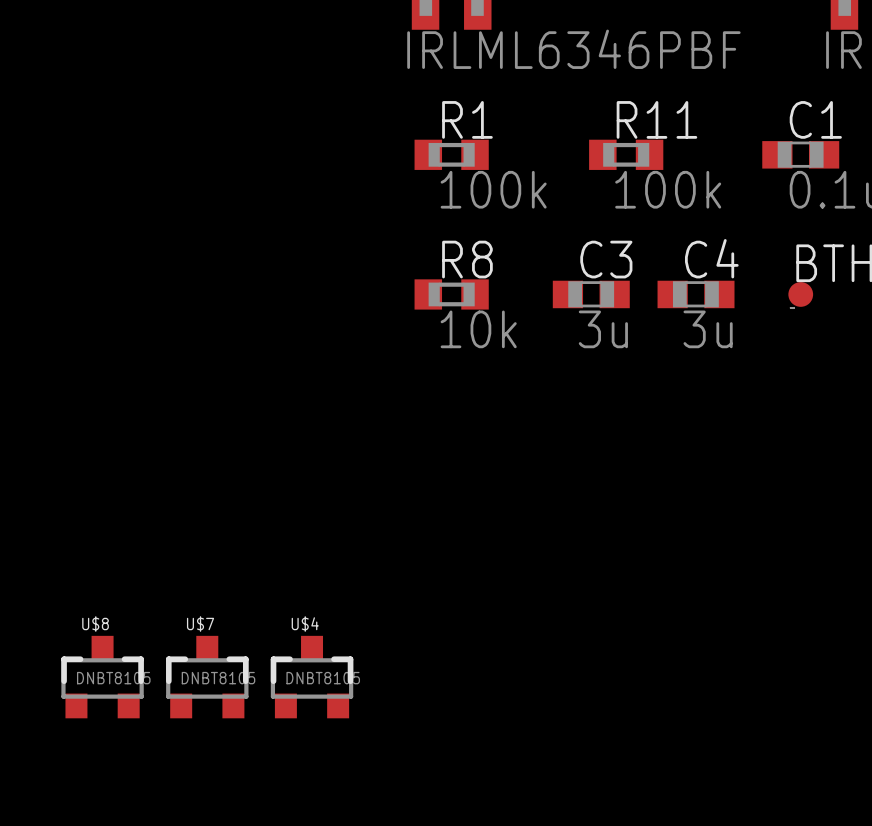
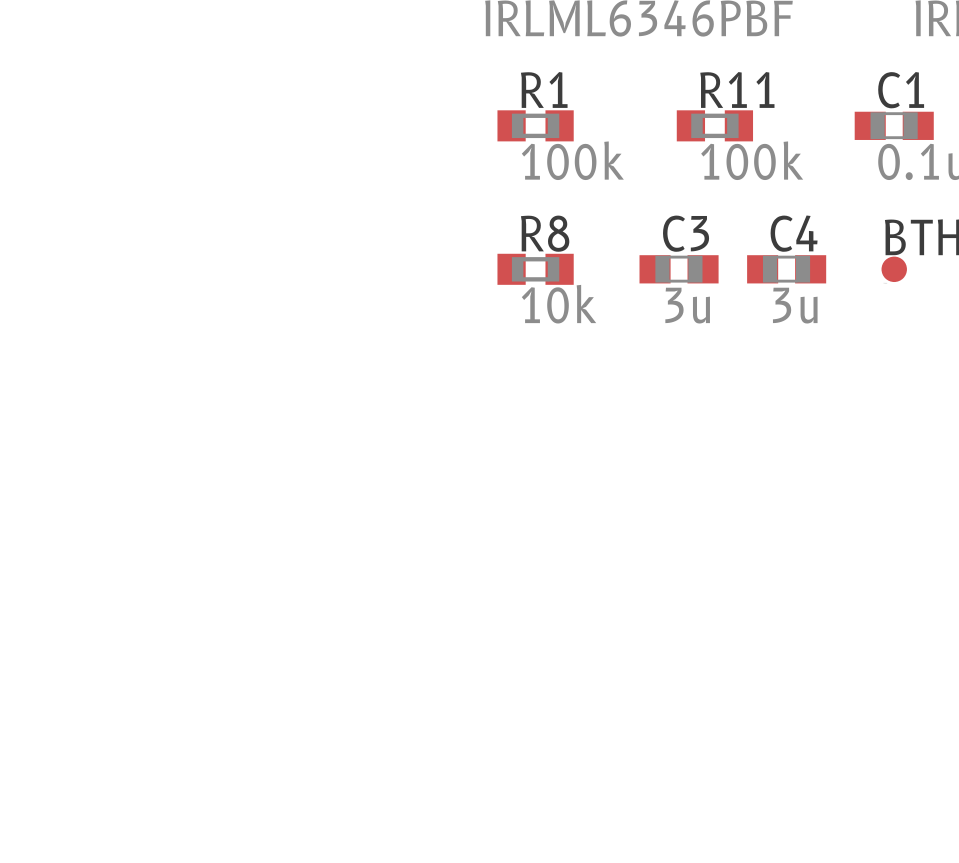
U$8: DNBT8105 (102, 677) -> none
U$7: DNBT8105 (207, 677) -> none
U$4: DNBT8105 (312, 677) -> none

